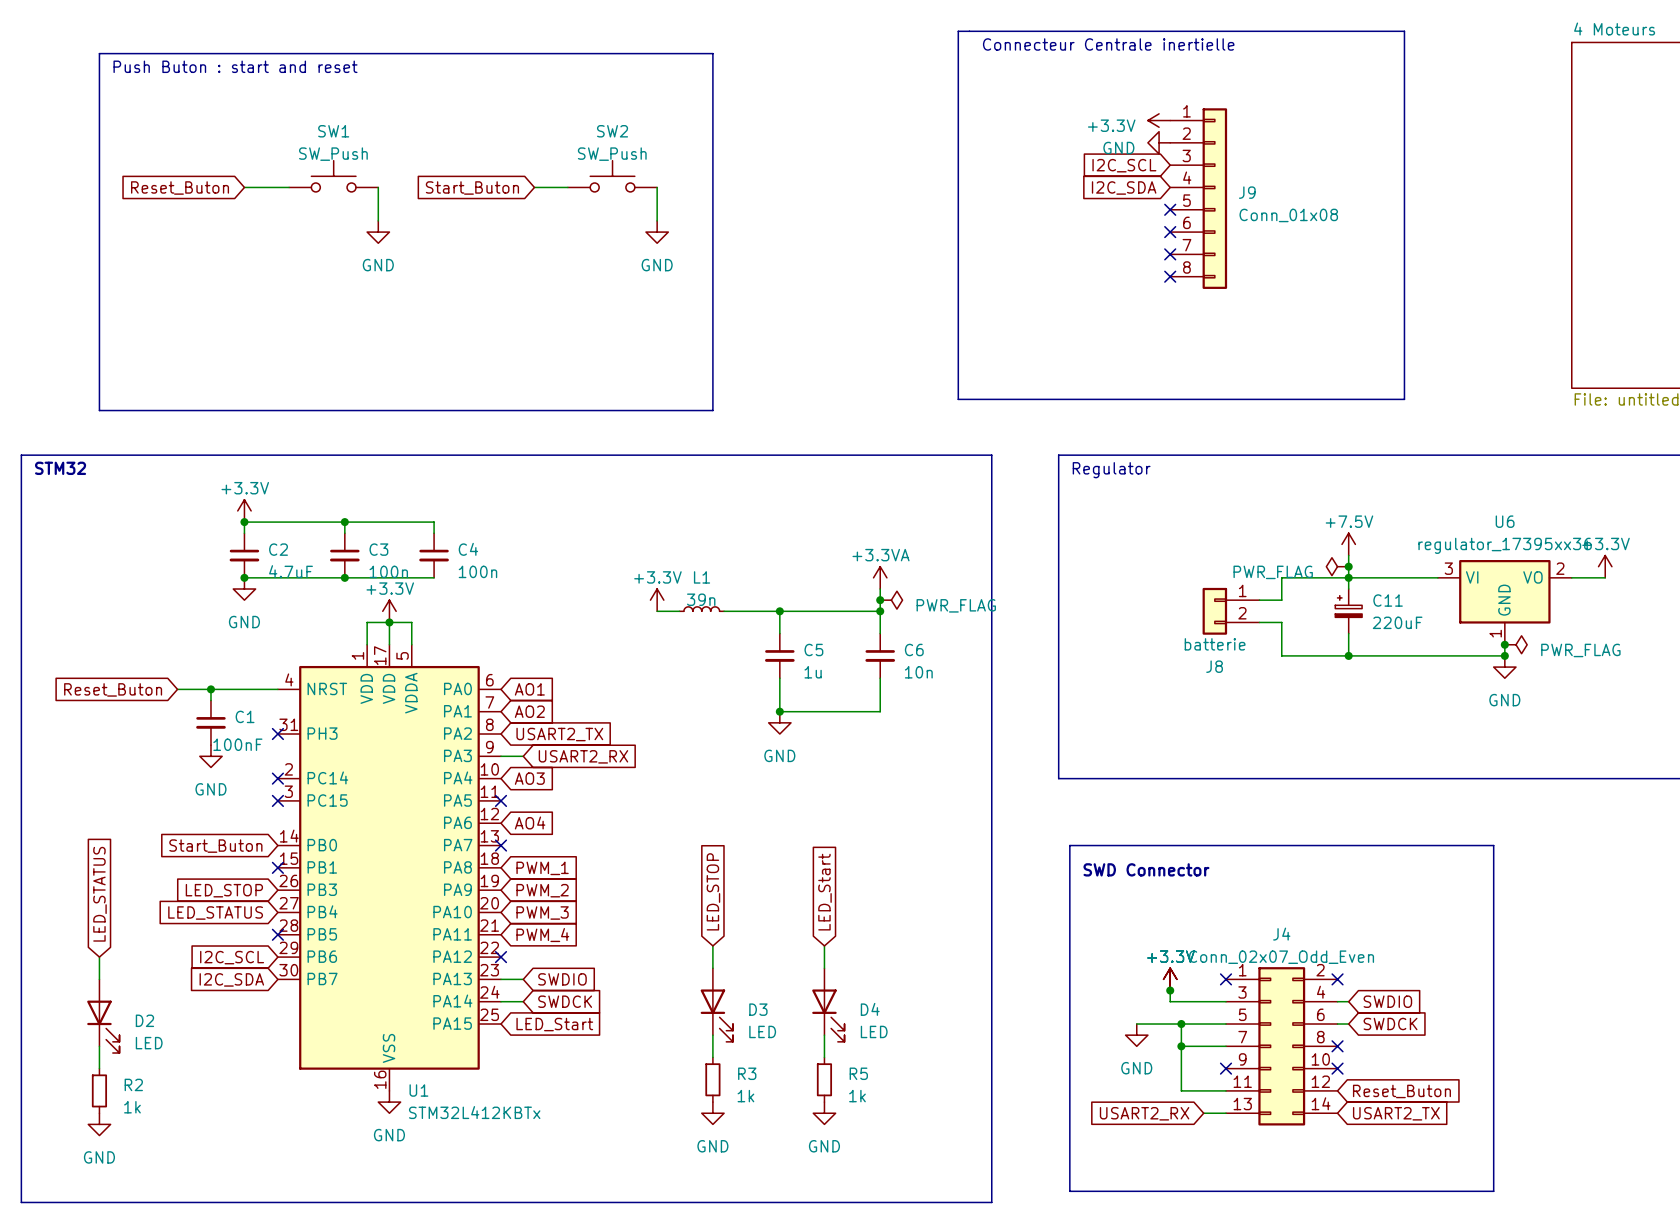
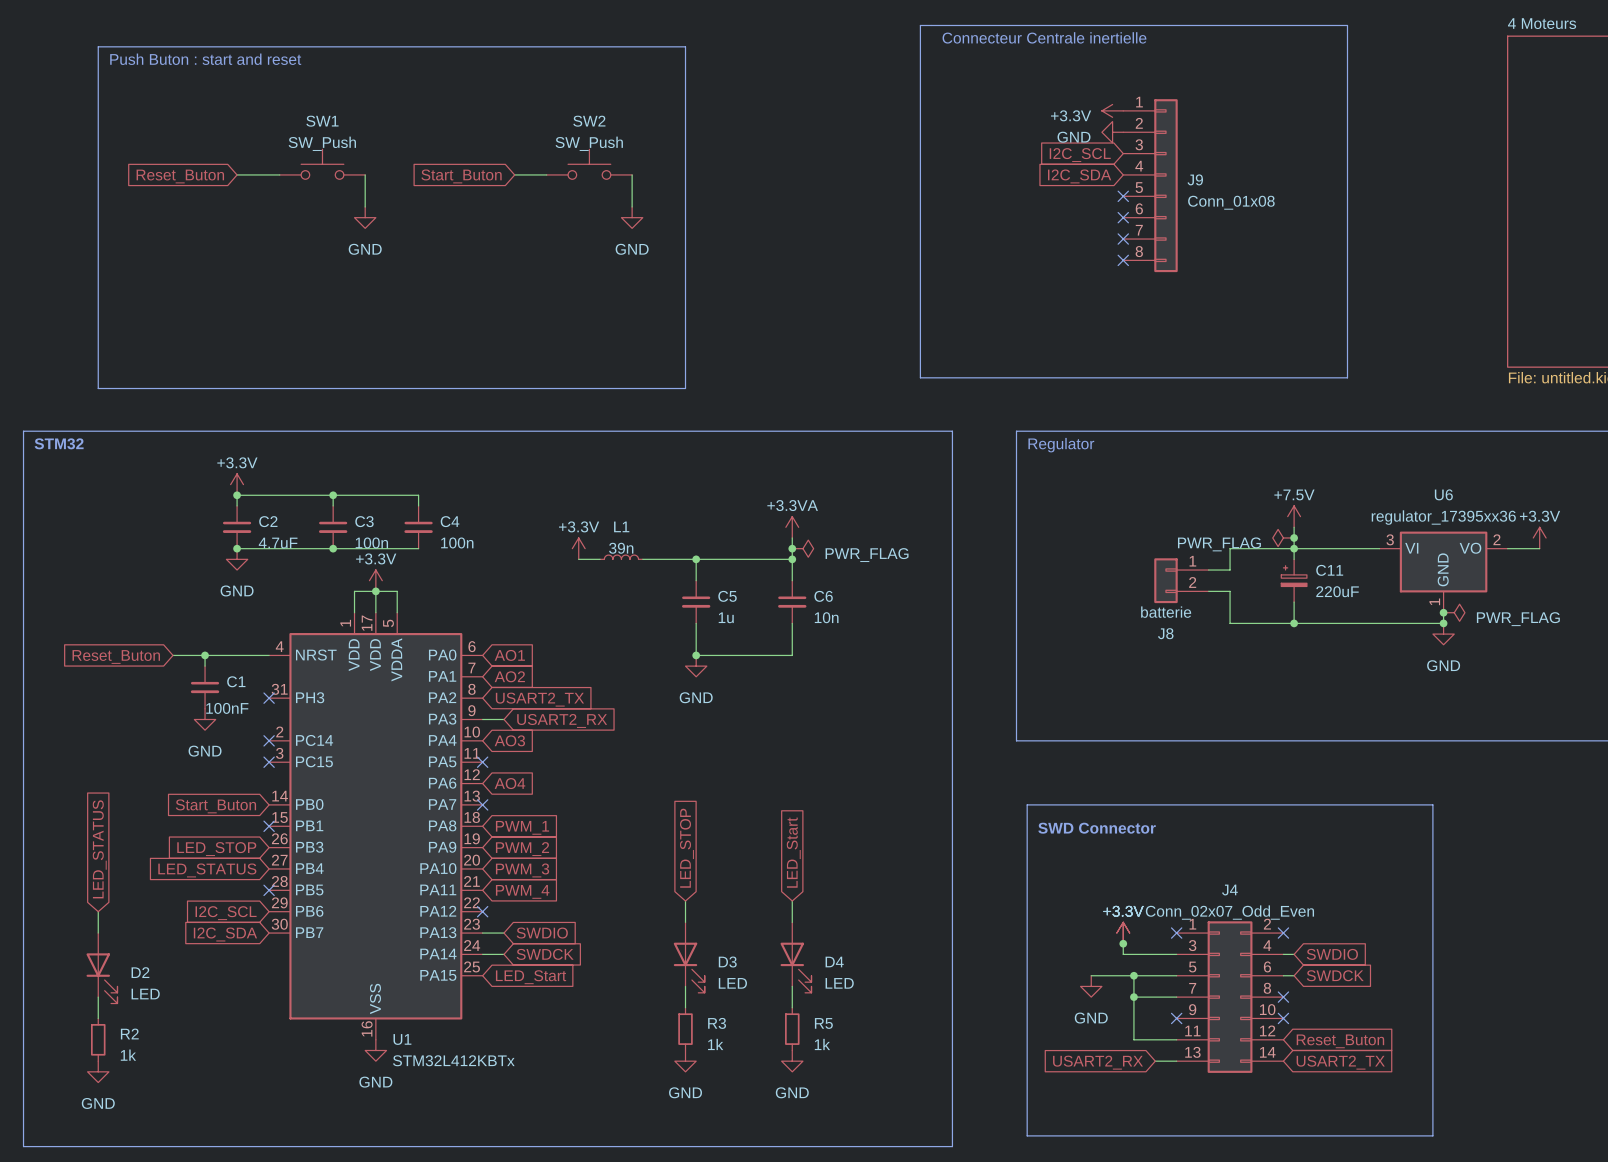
junction: none -> (792, 548)
power symbol position: +3.3VA (880, 577) -> +3.3VA (792, 527)
wire: none -> (642, 559) (792, 559)
junction: none -> (696, 559)
junction: none -> (792, 559)
wire: (880, 589) (880, 633) -> (792, 537) (792, 580)
power symbol position: +3.3V (657, 600) -> +3.3V (578, 548)
junction: (880, 600) -> none
power symbol position: PWR_FLAG (891, 600) -> PWR_FLAG (802, 548)
L1 position: (701, 609) -> (621, 557)
wire: (657, 611) (679, 611) -> (578, 559) (600, 559)
wire: (724, 611) (880, 611) -> (696, 580) (696, 559)
wire: (779, 611) (779, 633) -> none
junction: (779, 611) -> none
junction: (880, 611) -> none
C5 position: (779, 655) -> (696, 602)
C6 position: (880, 655) -> (792, 602)
wire: (779, 678) (779, 711) (880, 711) (880, 678) -> (696, 623) (696, 655) (792, 655) (792, 623)
junction: none -> (696, 655)
junction: (779, 711) -> none
power symbol position: GND (779, 722) -> GND (696, 666)

